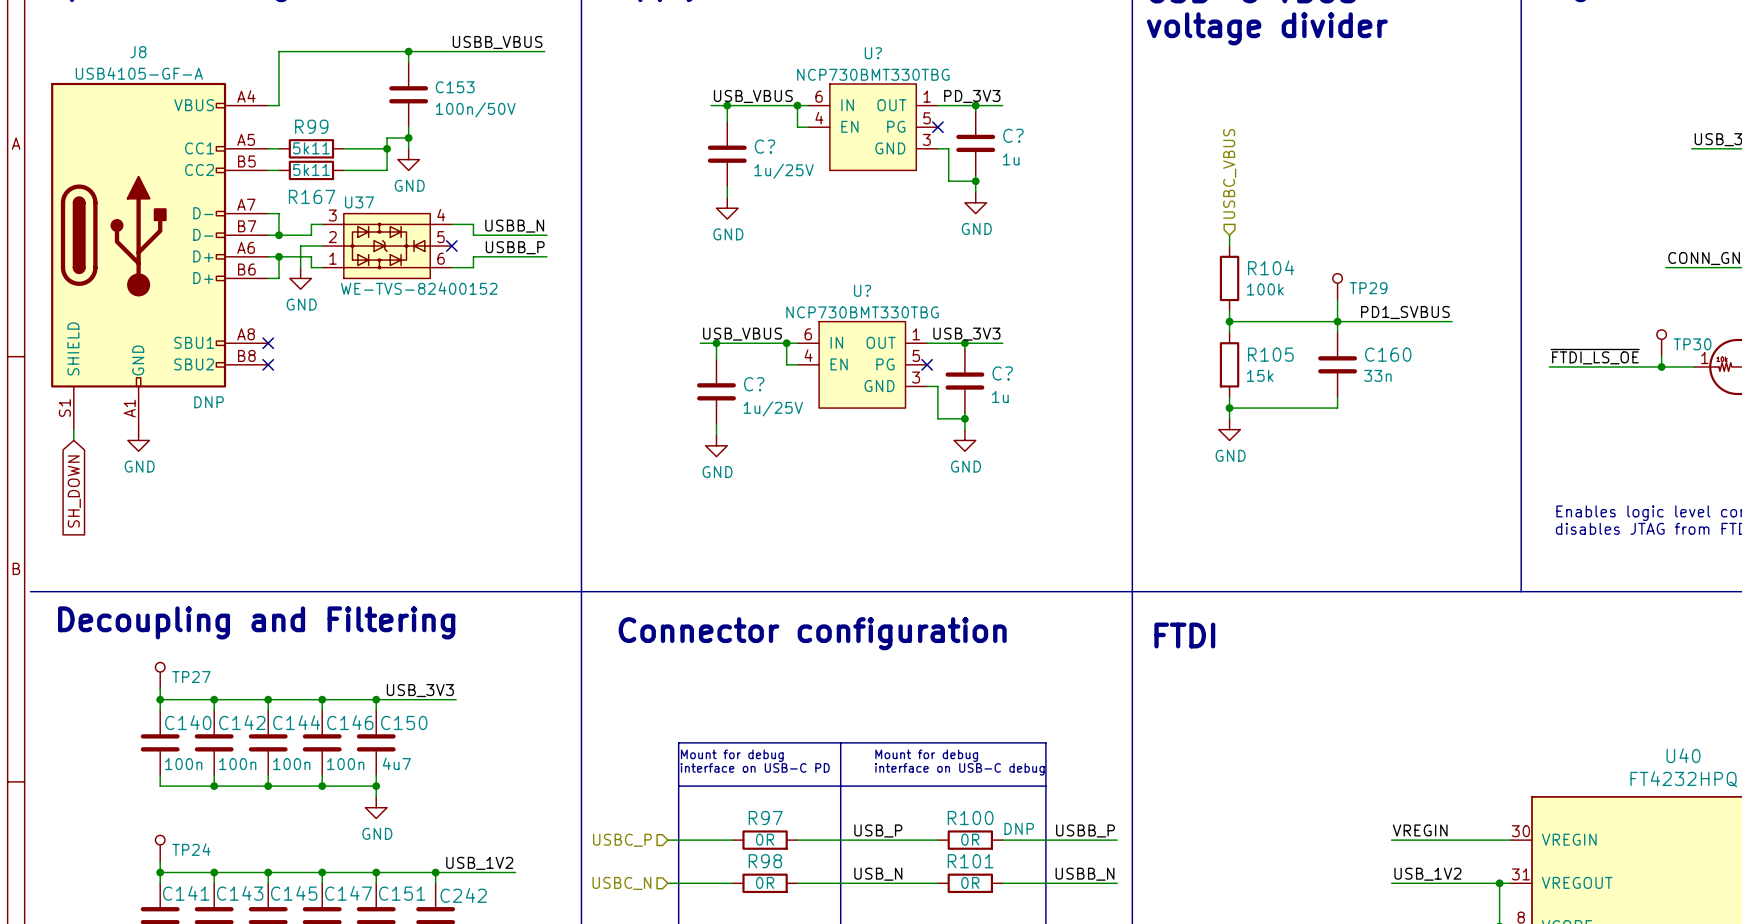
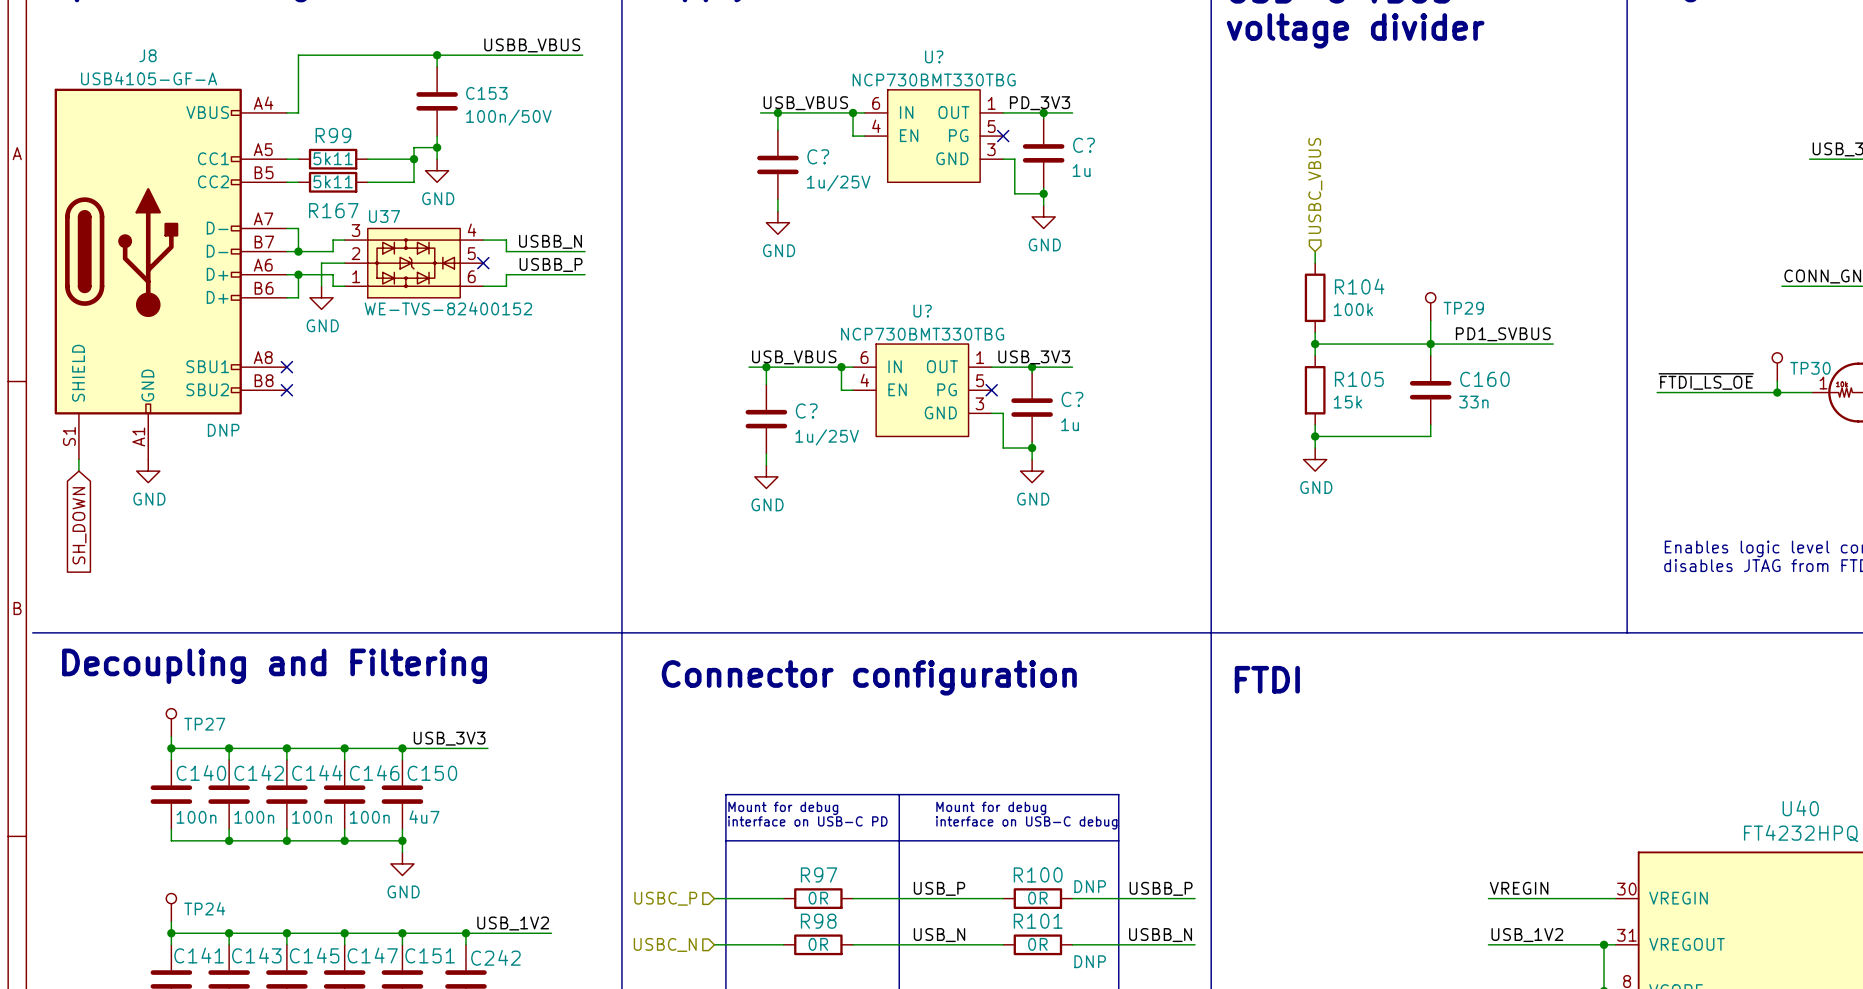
R101 text: none -> DNP (1090, 961)

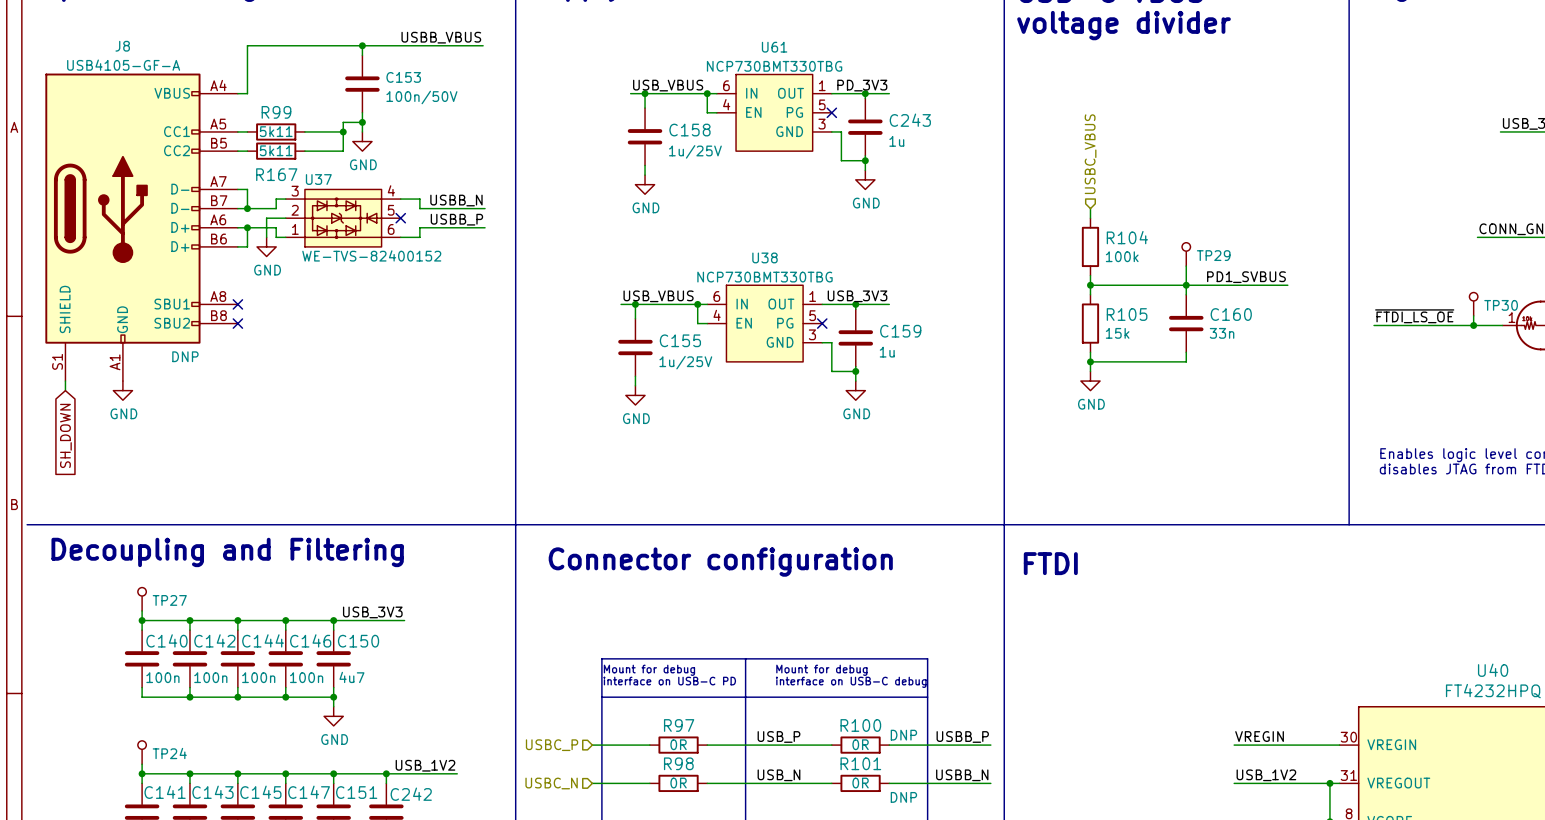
U? name: U? (934, 56) -> U61 (774, 47)
C? name: C? (1084, 145) -> C243 (910, 120)
C? name: C? (818, 156) -> C158 (689, 130)
U? name: U? (922, 311) -> U38 (764, 257)
C? name: C? (1072, 399) -> C159 (900, 331)
C? name: C? (806, 411) -> C155 (680, 340)

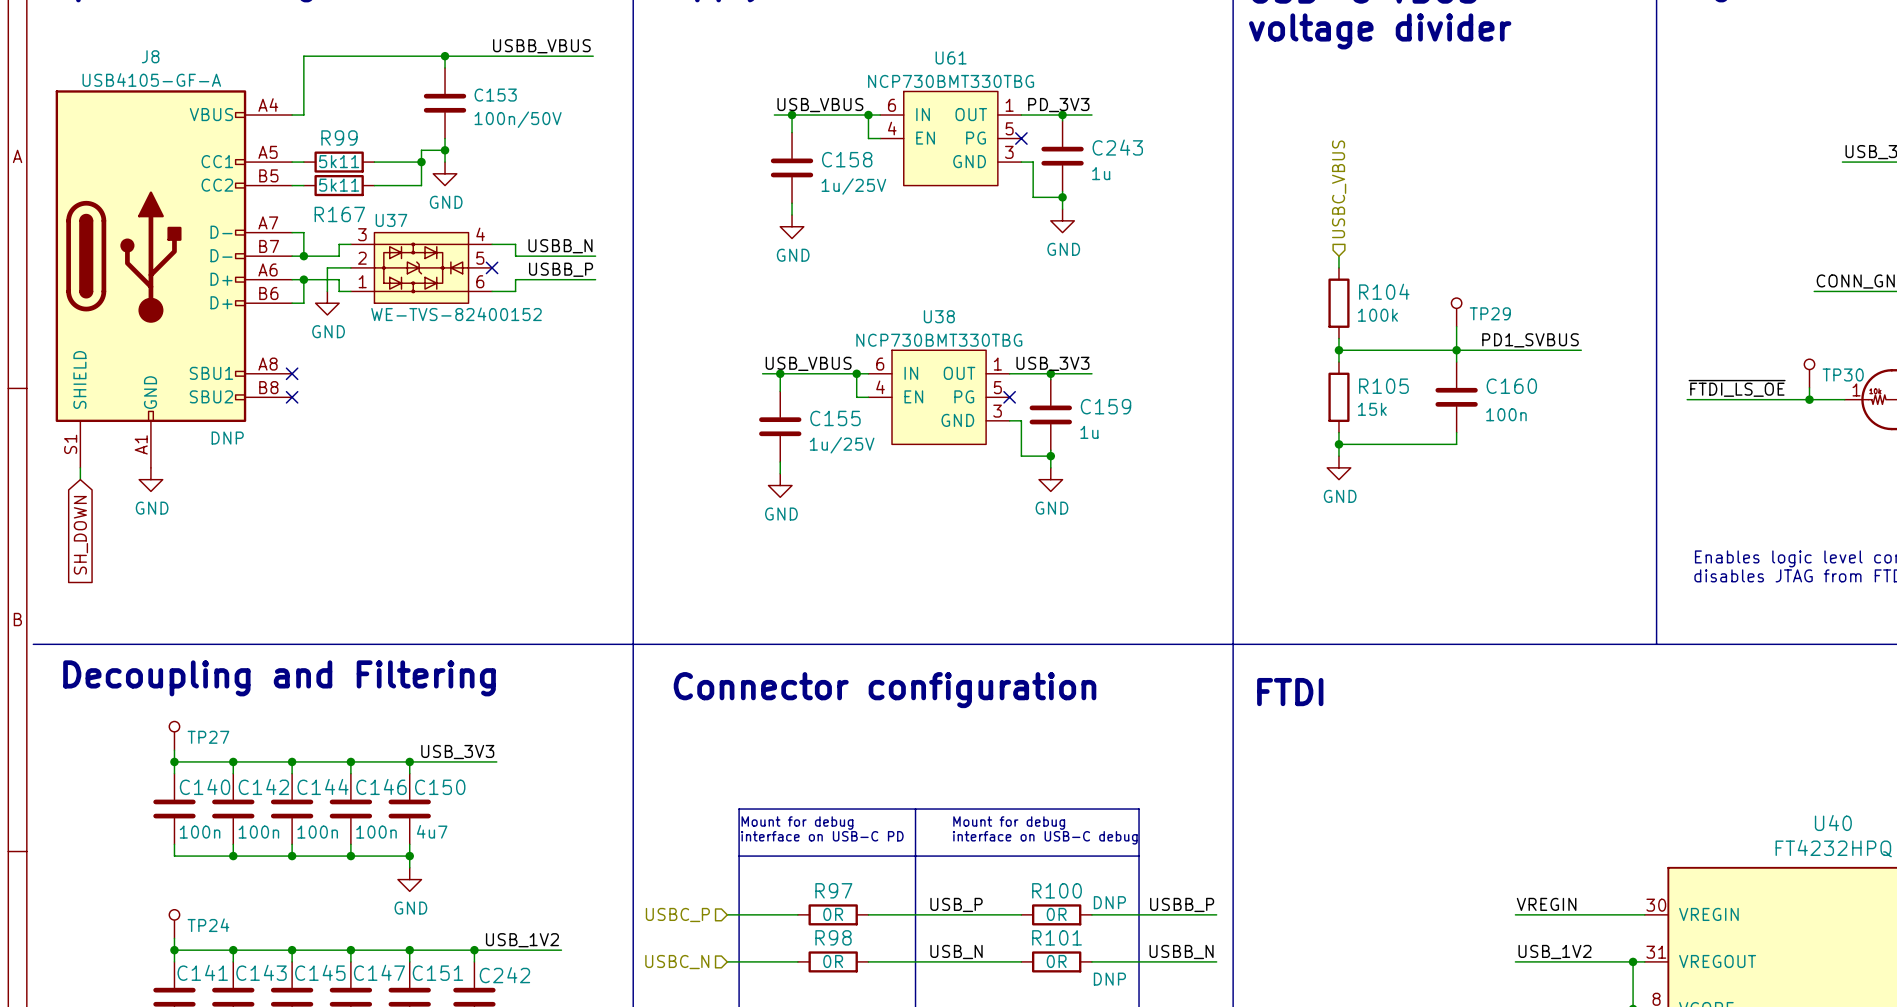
C160 text: 33n (1222, 333) -> 100n (1506, 414)

